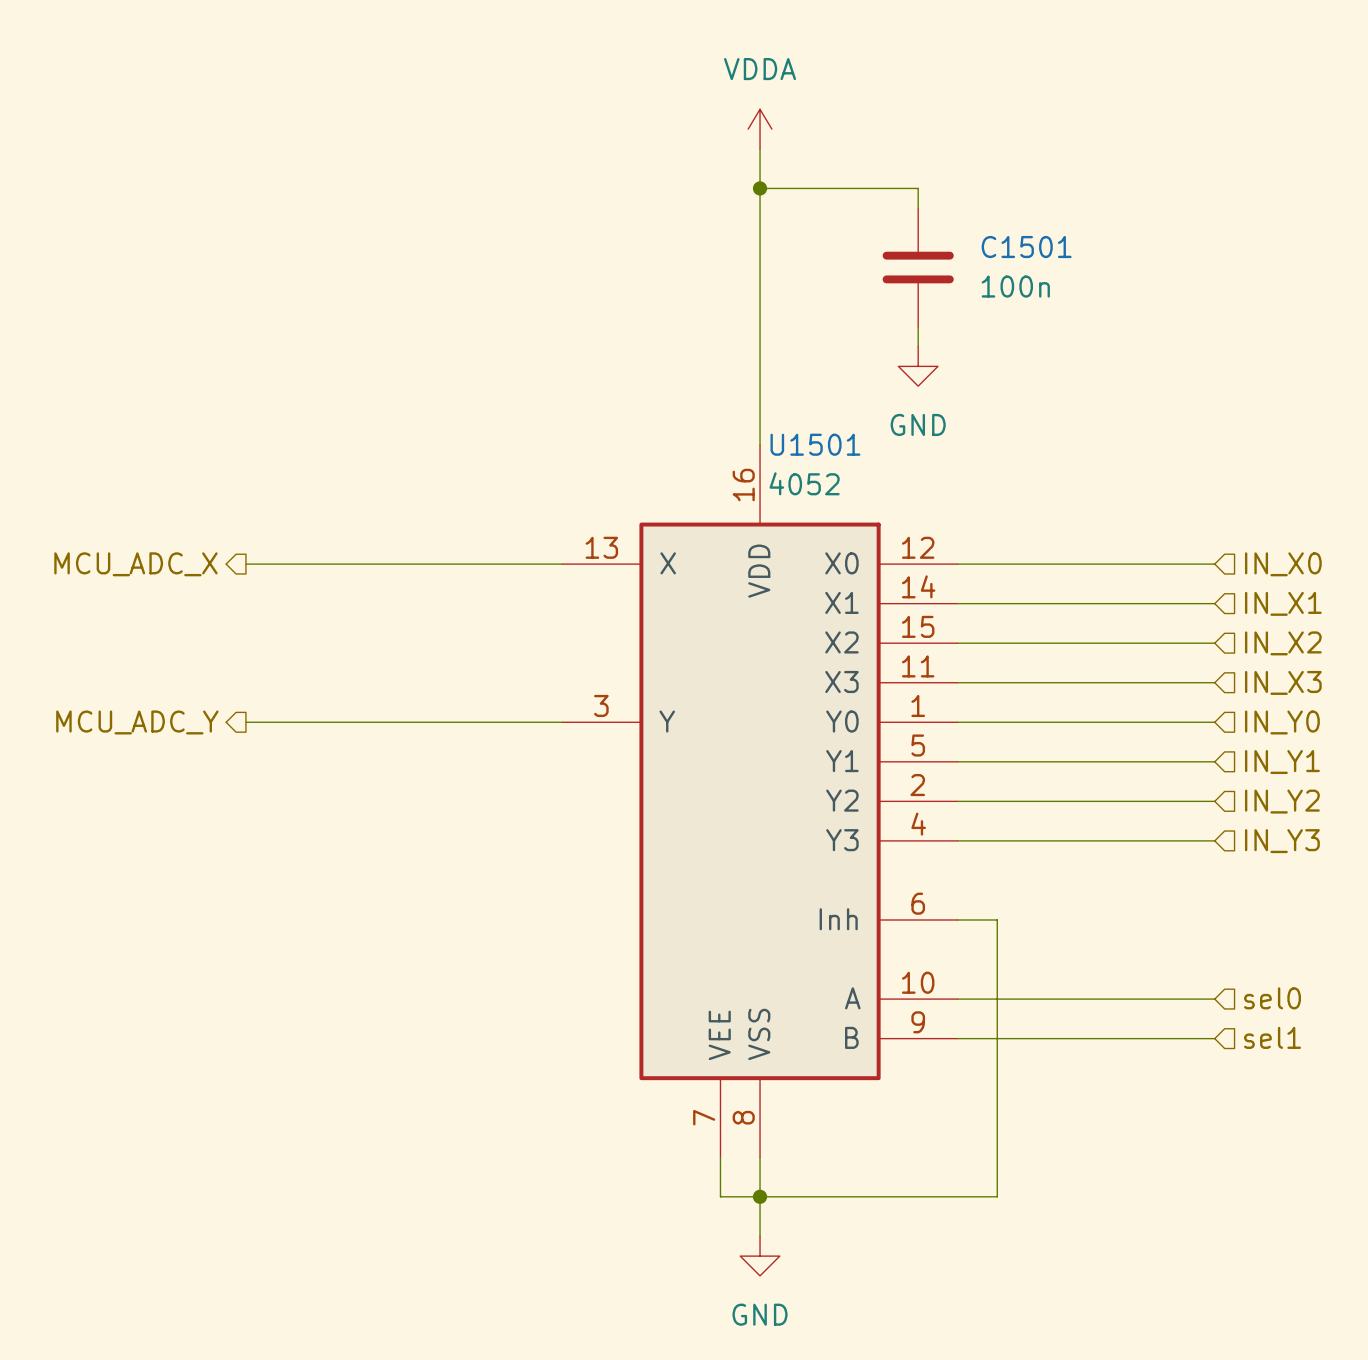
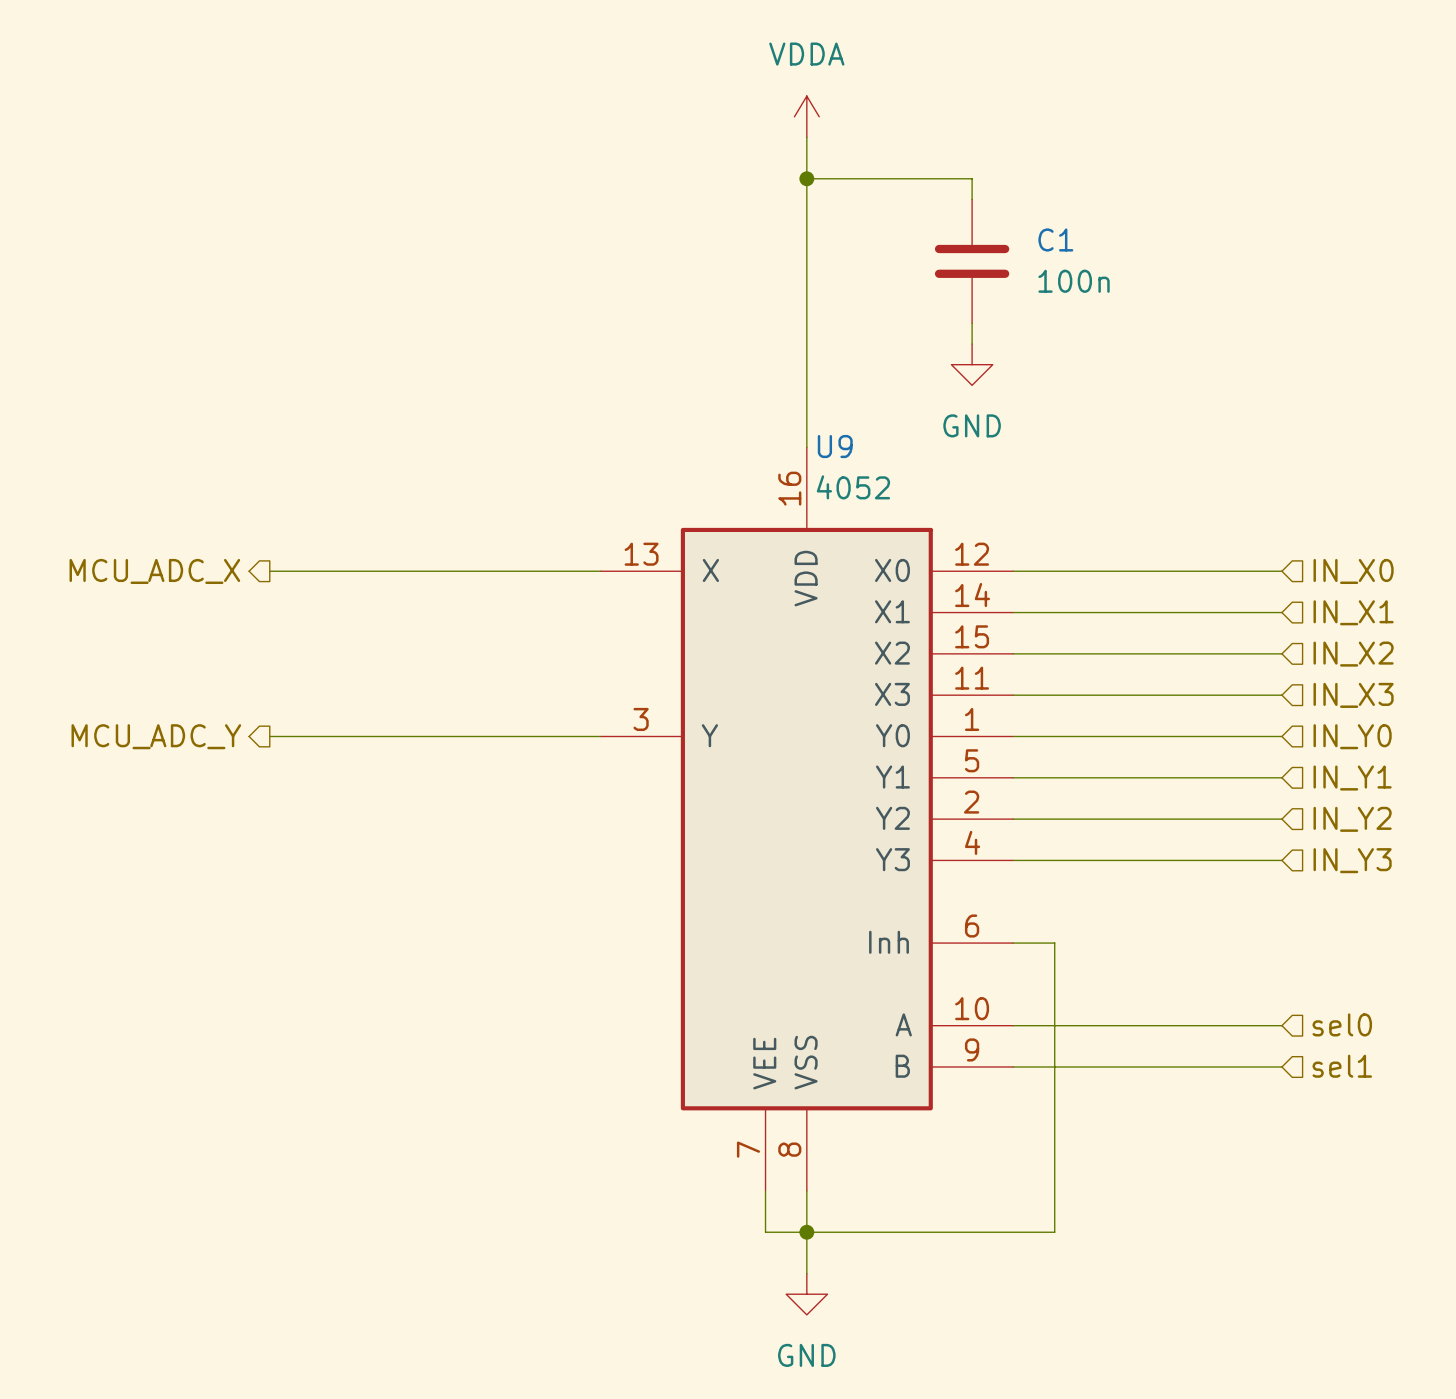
C1501 name: C1501 (1026, 247) -> C1 (1055, 239)
U1501 name: U1501 (815, 444) -> U9 (835, 446)

